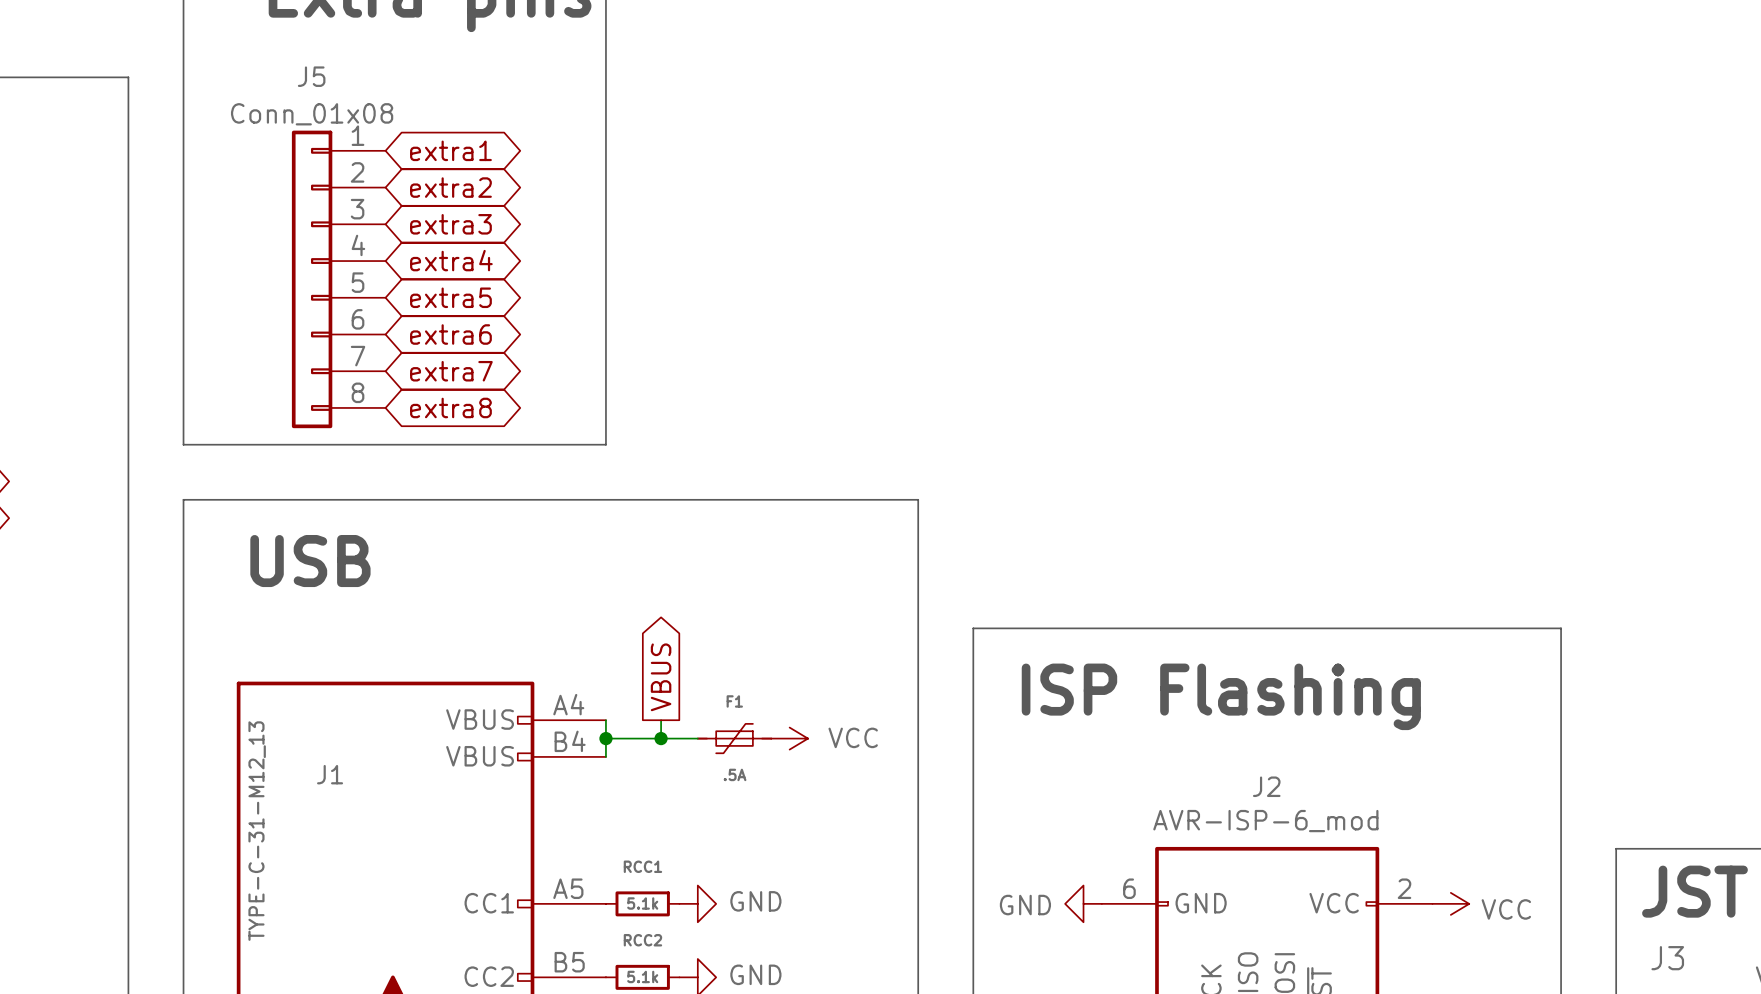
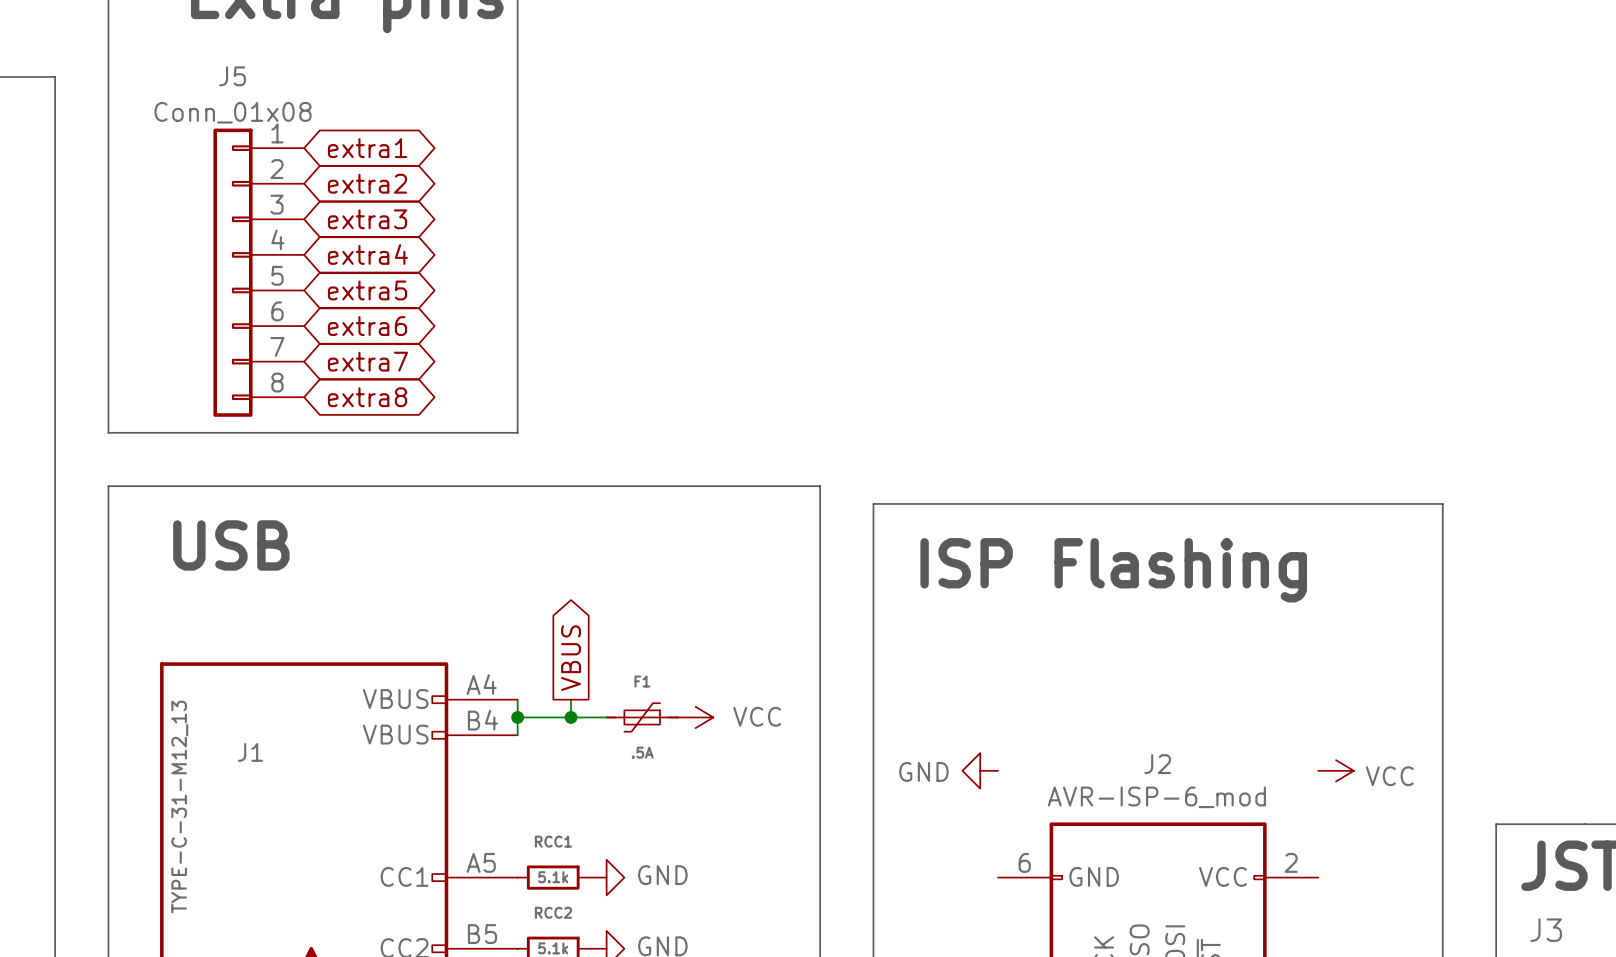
line: (973, 628) (1561, 628) -> (873, 610) (873, 503) (1442, 503) (1442, 610)
text position: ISP Flashing (1221, 696) -> ISP Flashing (1113, 570)
power symbol position: GND (1083, 903) -> GND (980, 770)
power symbol position: VCC (1450, 903) -> VCC (1336, 770)

